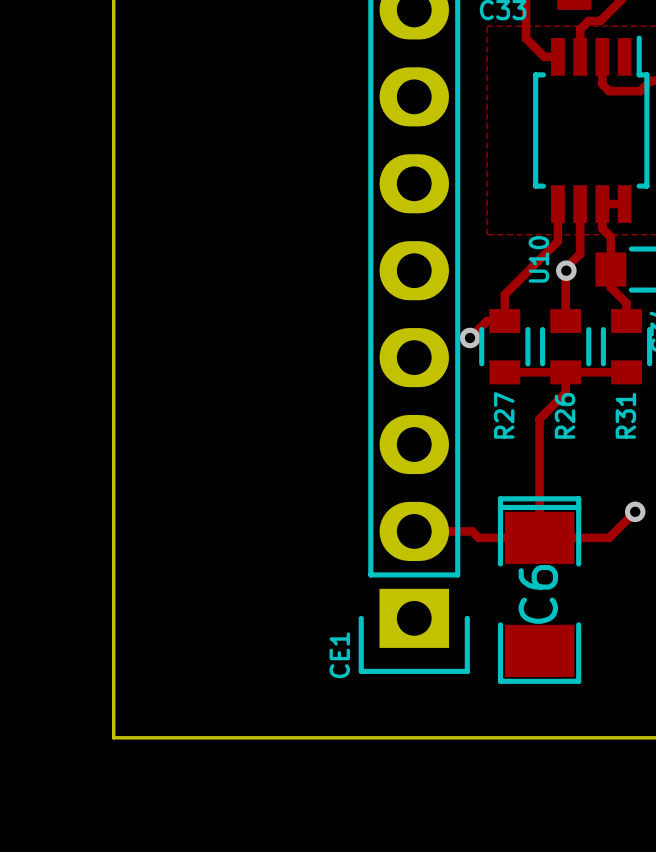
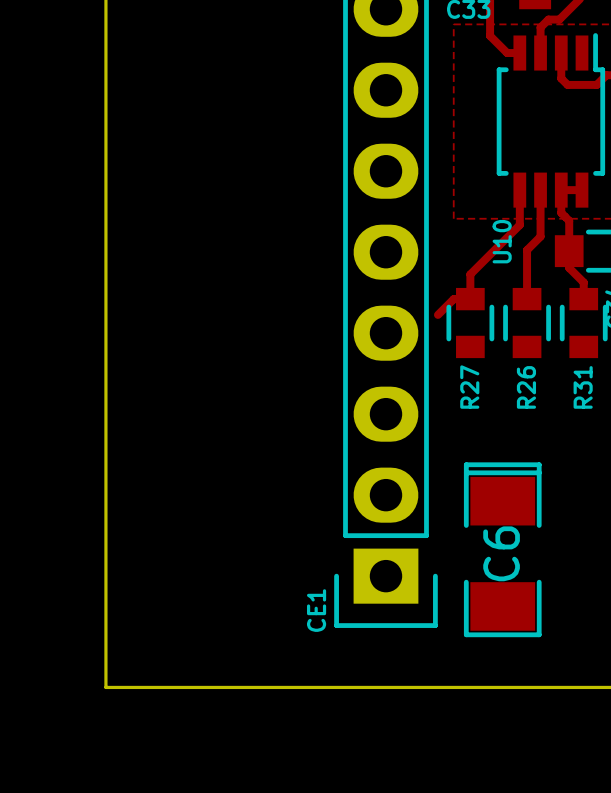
via: (566, 270) -> none
via: (470, 337) -> none
track: (504, 372) (626, 372) -> none
track: (565, 372) (565, 392) (539, 418) (539, 537) -> none
track: (635, 511) (609, 537) (478, 537) (472, 531) (414, 531) -> none
via: (635, 511) -> none

